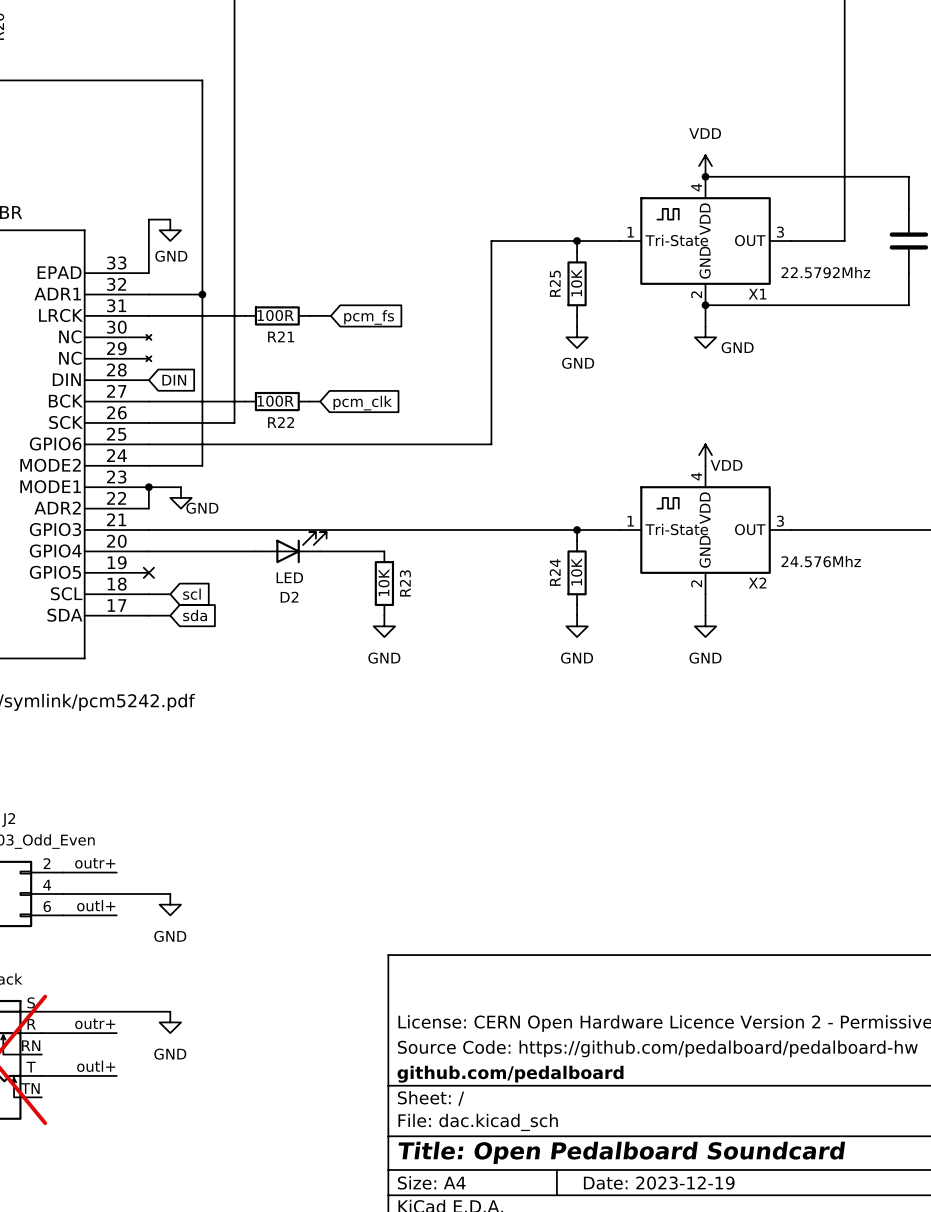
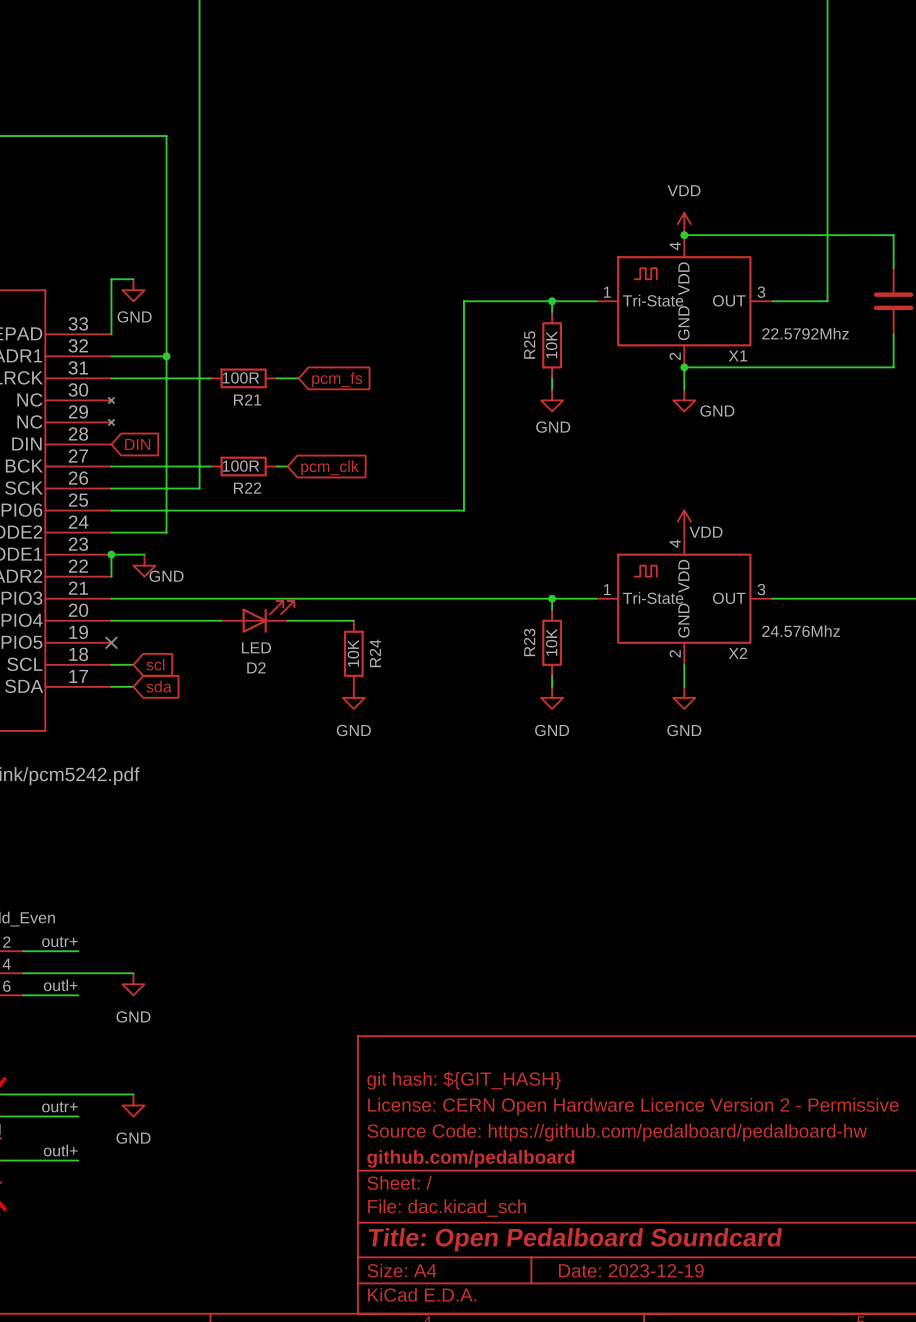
R24 name: R24 (555, 572) -> R23 (529, 642)
R23 name: R23 (405, 583) -> R24 (375, 653)
title block: none -> git hash: ${GIT_HASH} (464, 1080)

